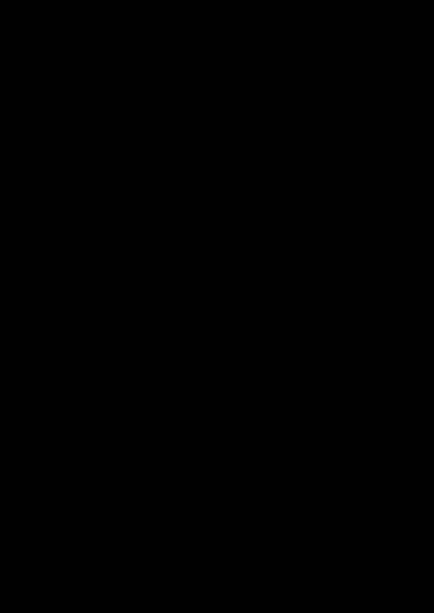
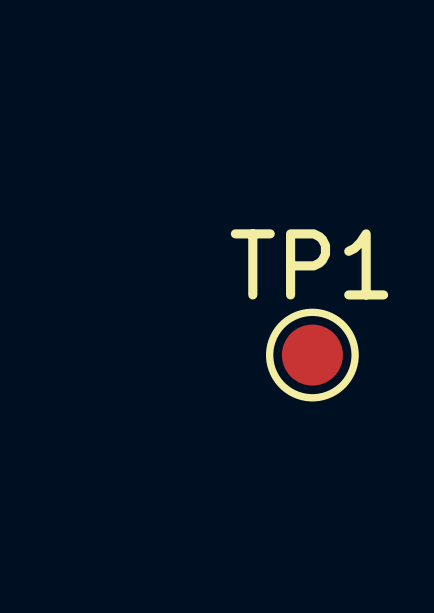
TP1: none -> (312, 355)

